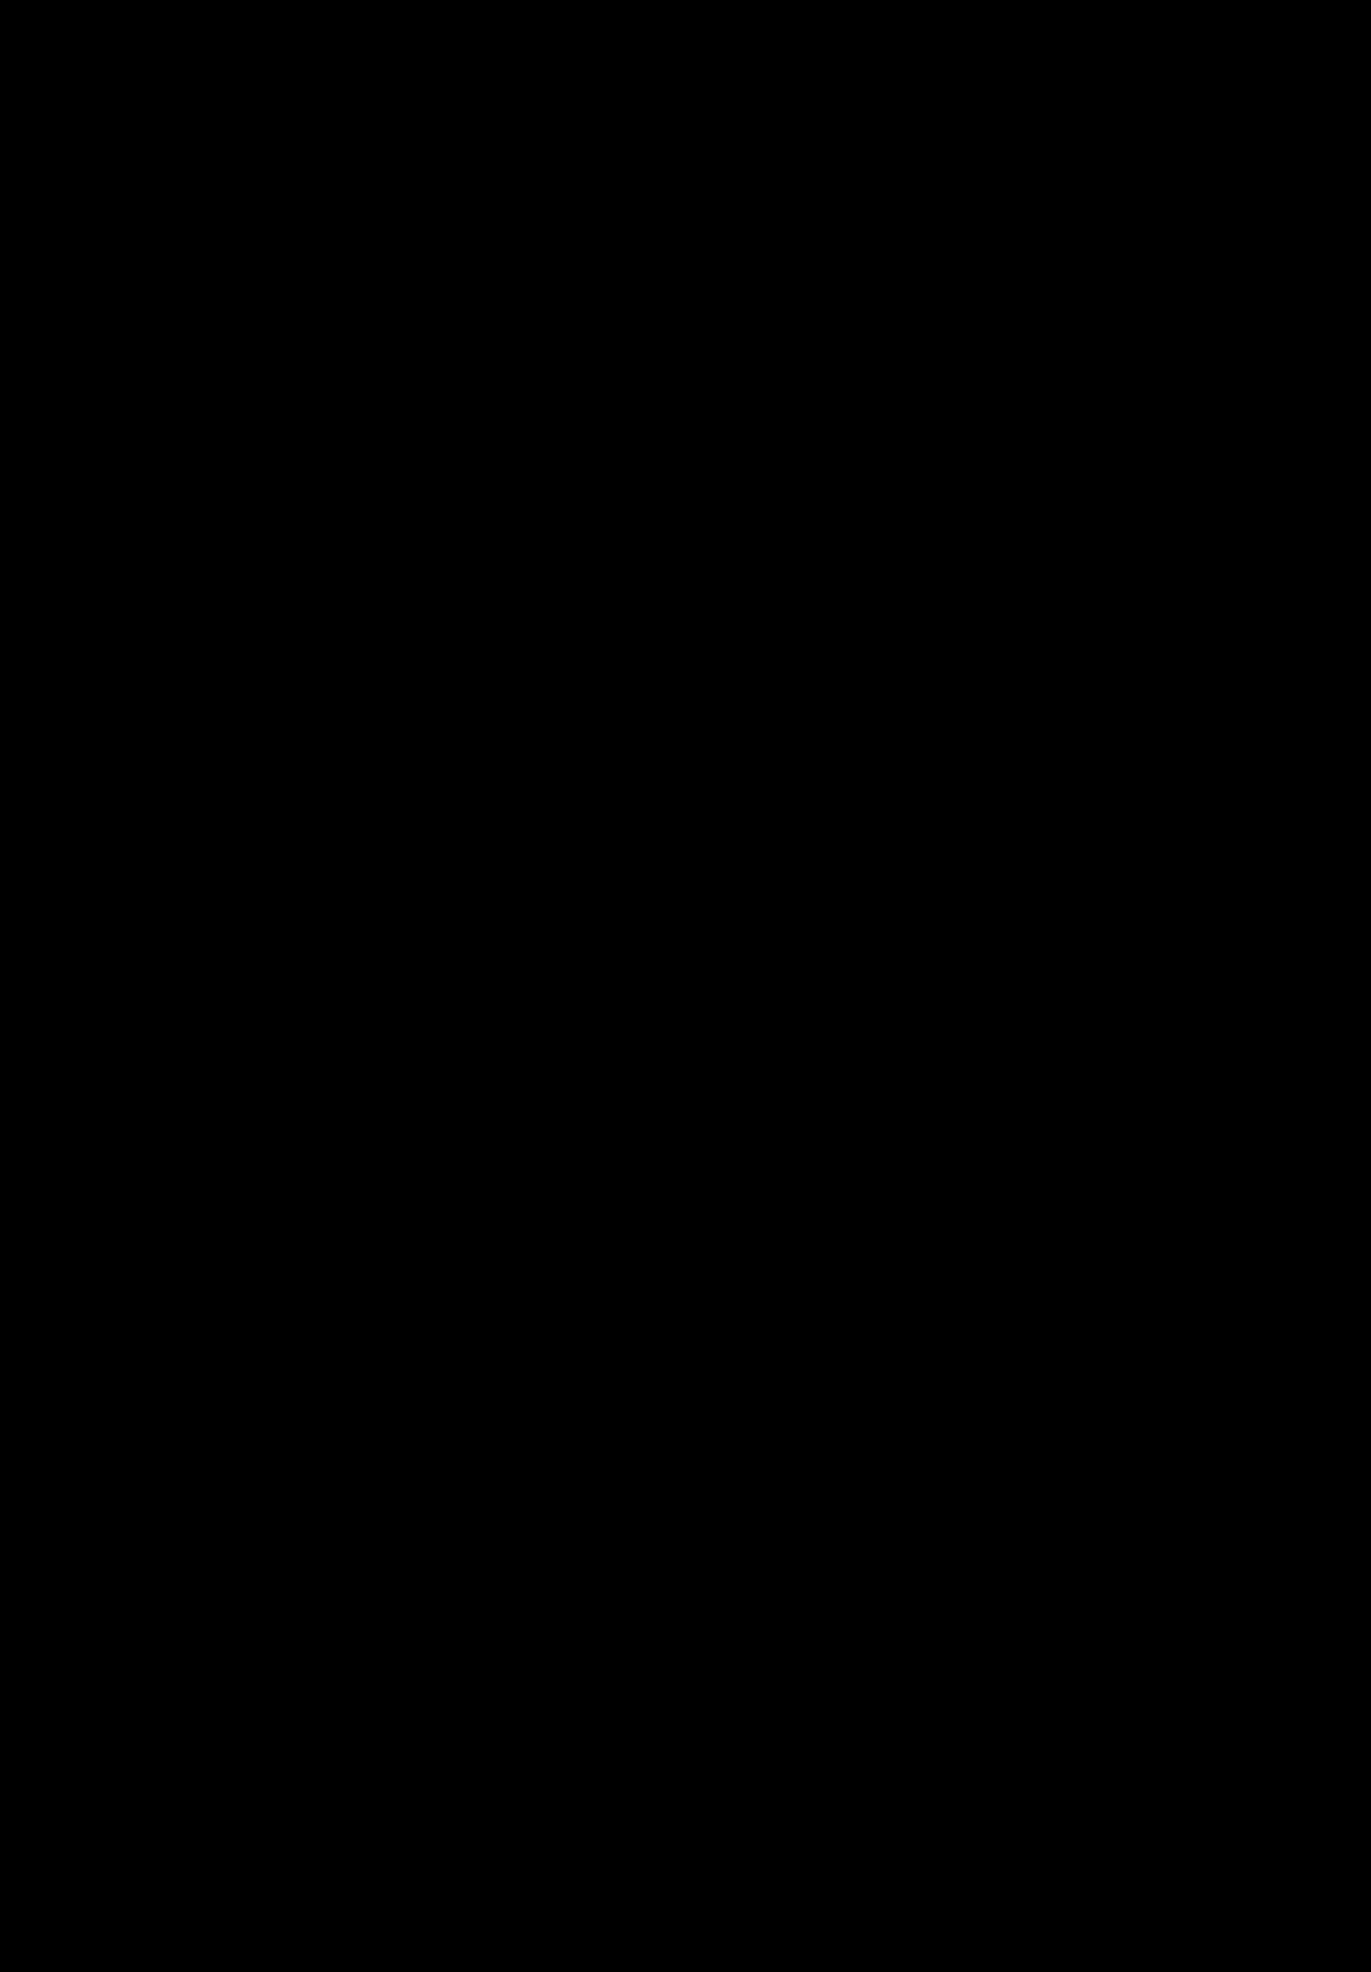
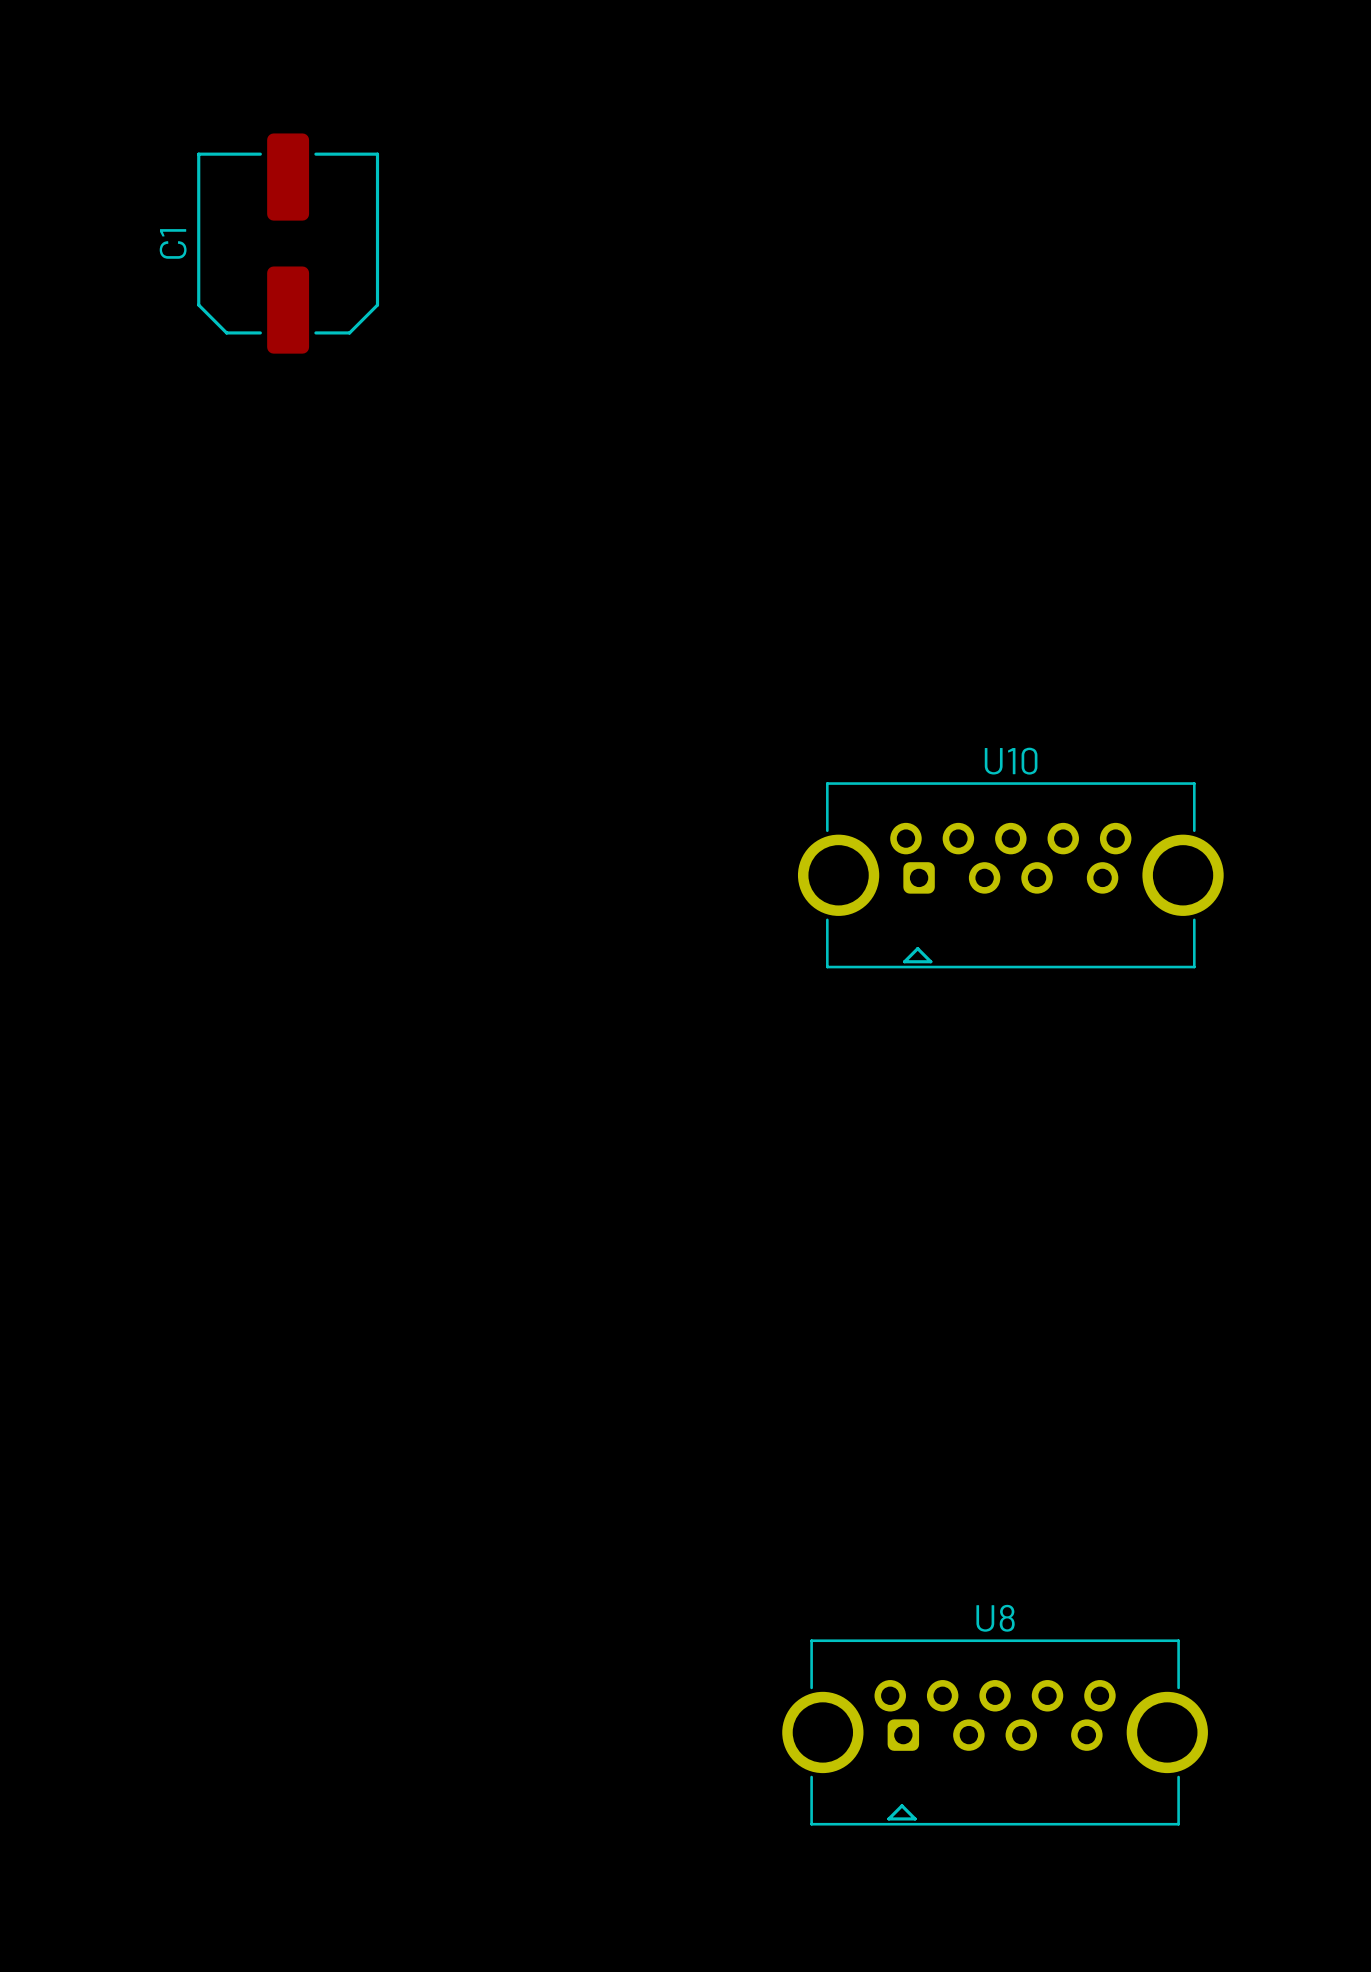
C1: none -> (288, 243)
U10: none -> (1010, 875)
U8: none -> (995, 1732)

